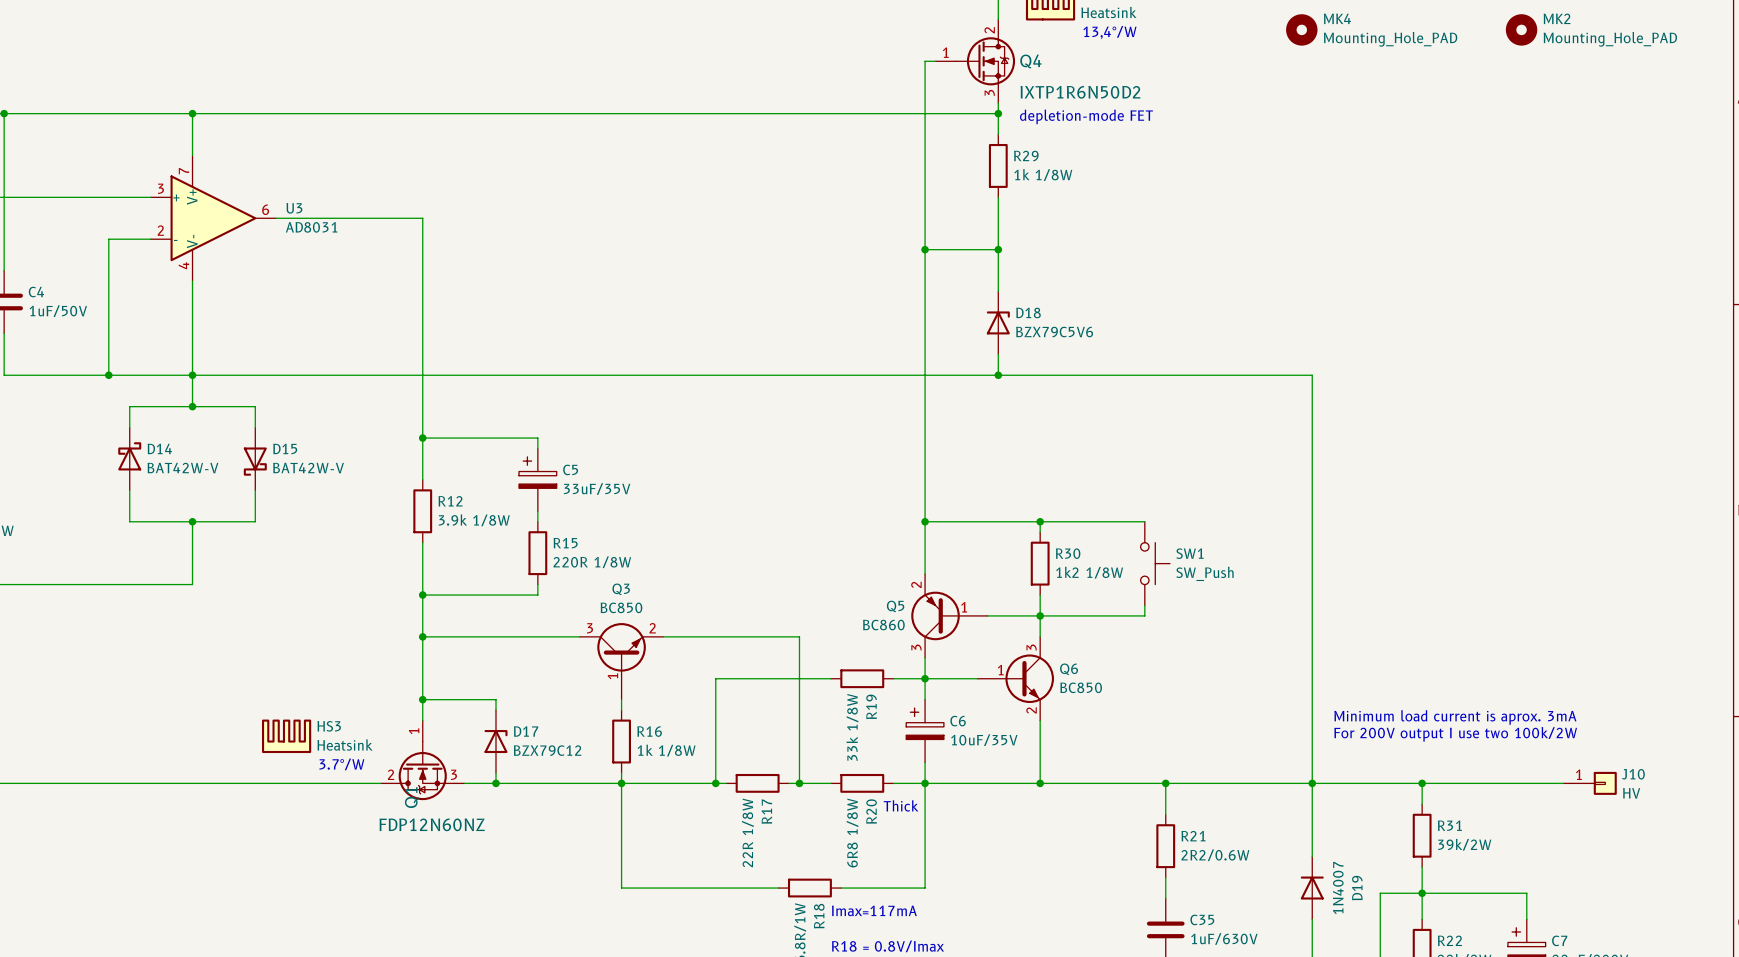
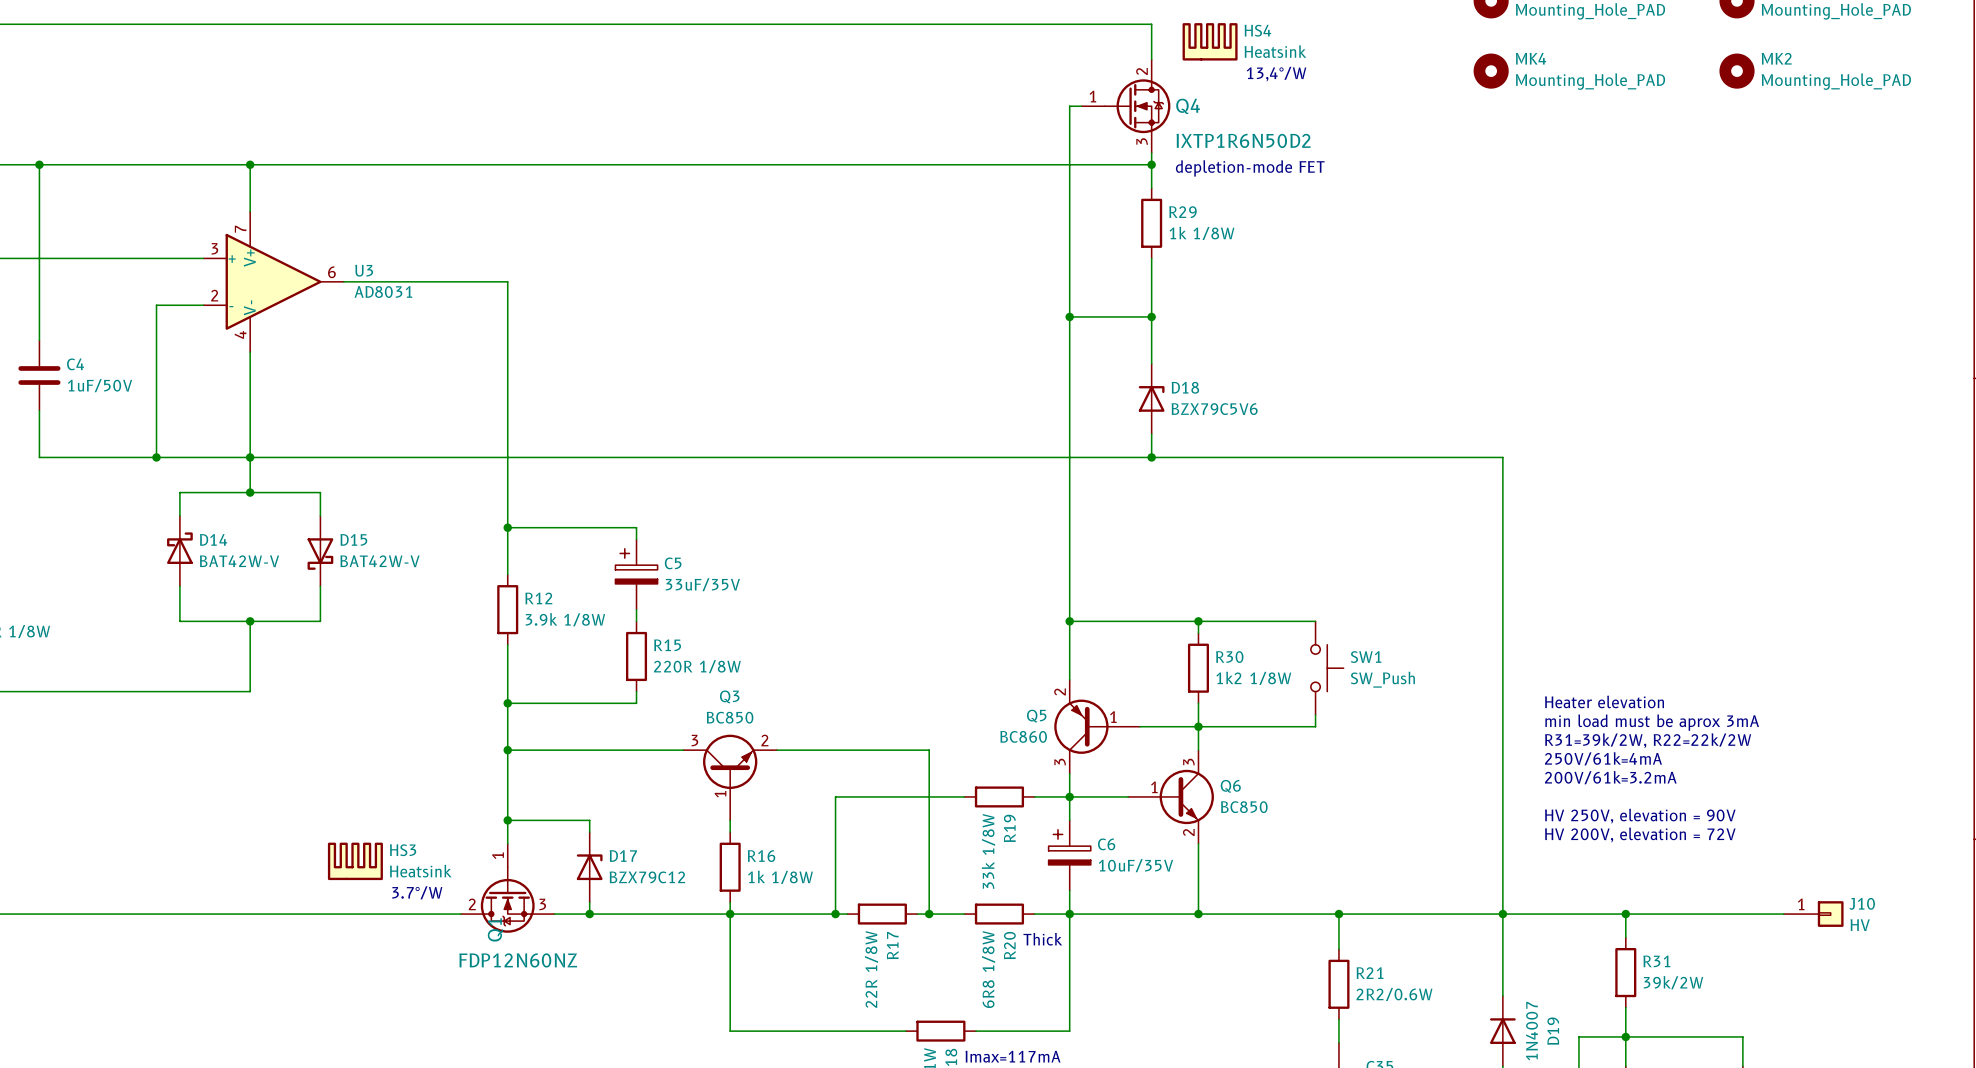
text: none -> Heater elevation (1604, 701)
text: none -> min load must be aprox 3mA (1652, 722)
text: none -> R31=39k/2W, R22=22k/2W (1648, 740)
text: none -> 250V/61k=4mA (1603, 758)
text: none -> 200V/61k=3.2mA (1610, 777)
text: none -> HV 250V, elevation = 90V (1640, 816)
text: none -> HV 200V, elevation = 72V (1640, 834)
text: Minimum load current is aprox. 3mA (1455, 717) -> none
text: For 200V output I use two 100k/2W (1455, 734) -> none

